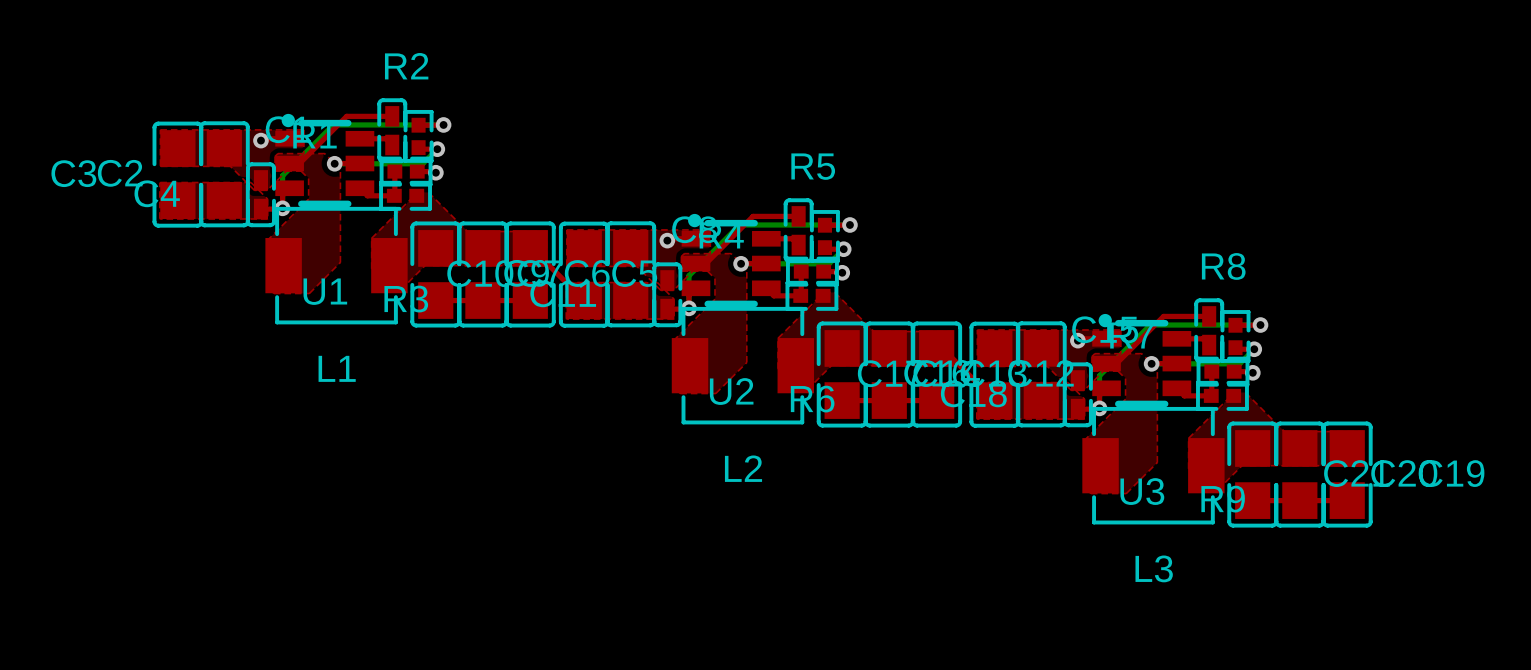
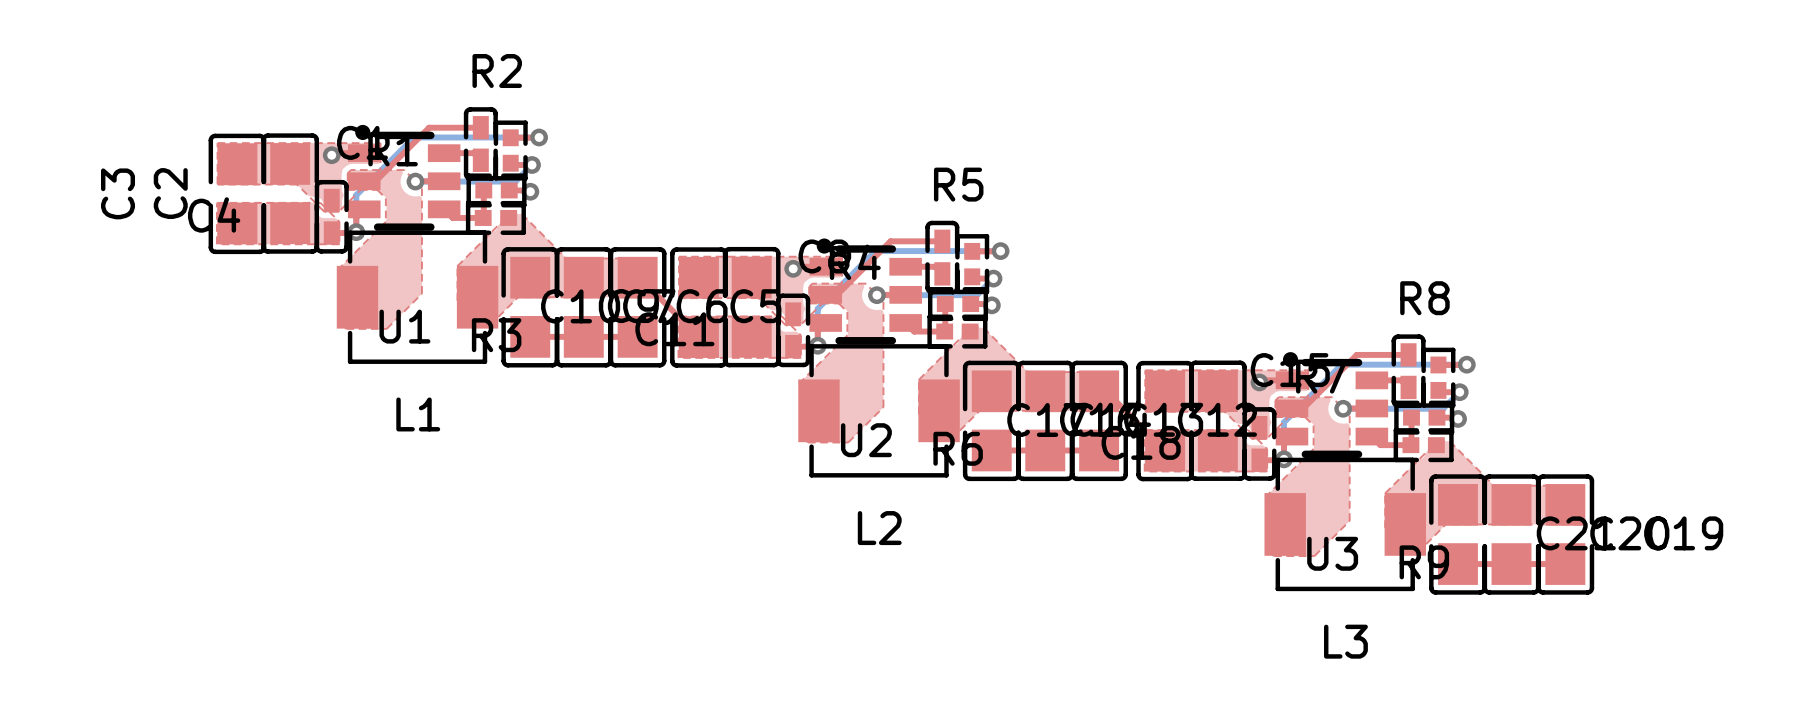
C3 name rotation: 0° (73, 173) -> 90° counterclockwise (118, 193)
C2 name rotation: 0° (120, 173) -> 90° counterclockwise (170, 193)

